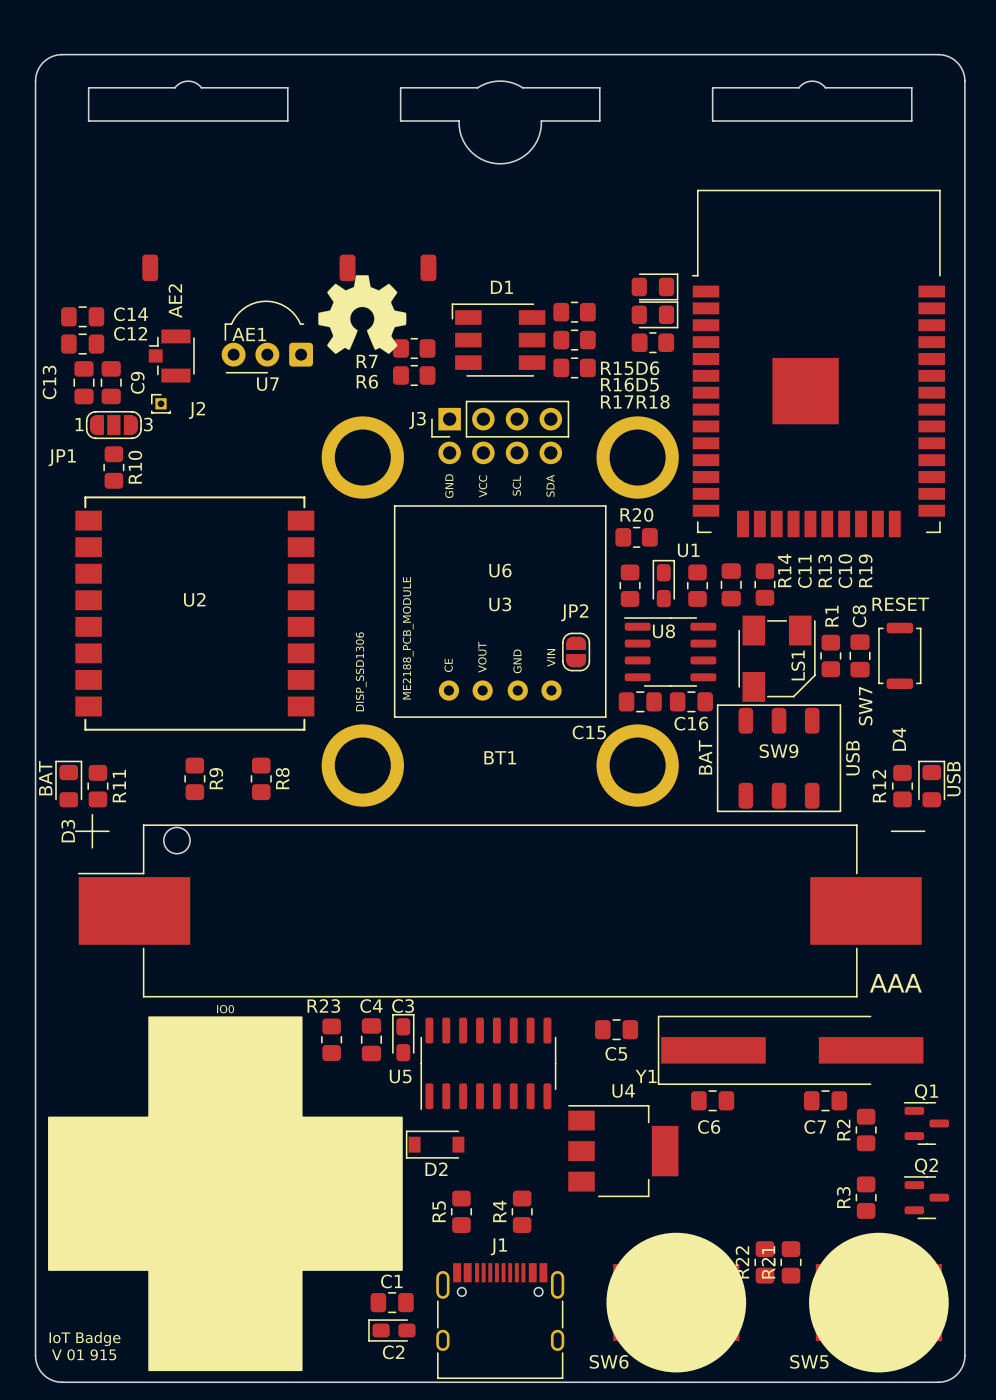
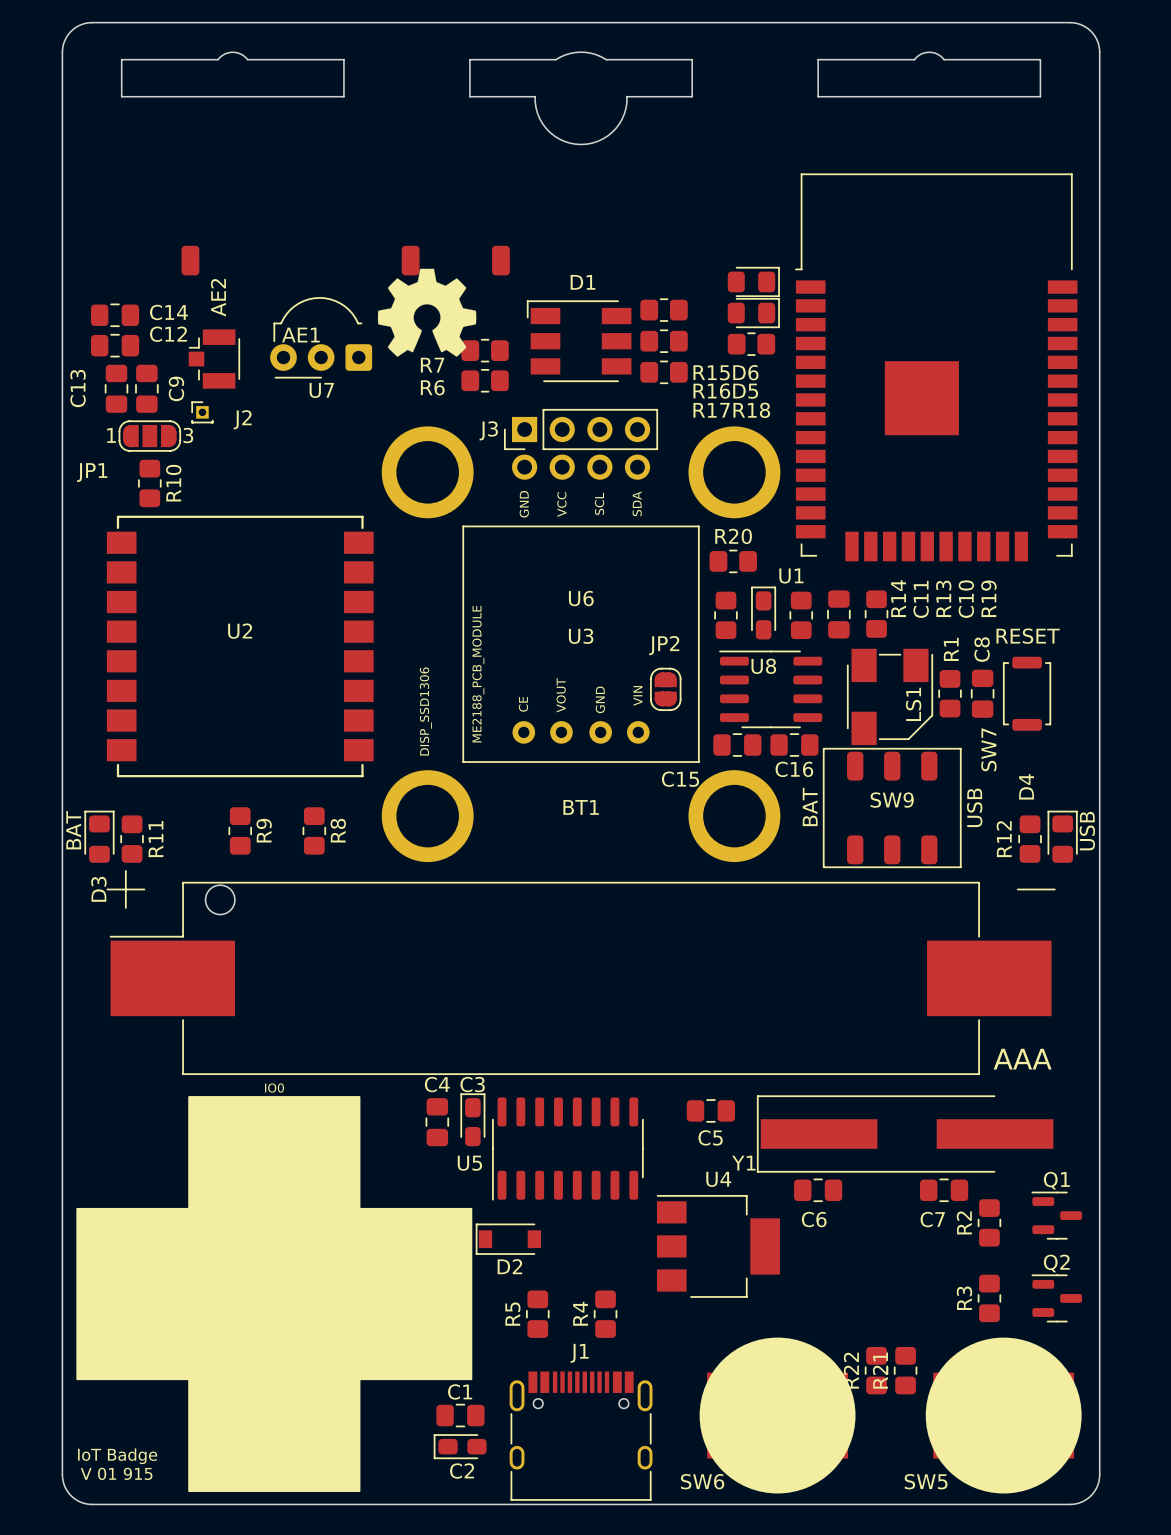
R23: (331, 1039) -> none

